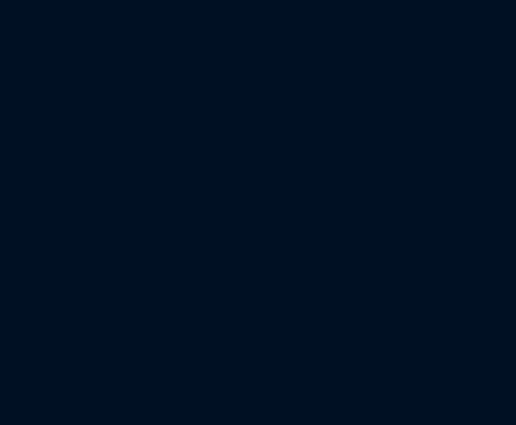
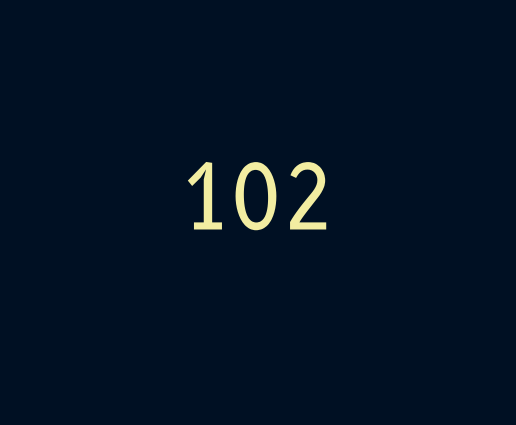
text: none -> 102 (257, 196)

